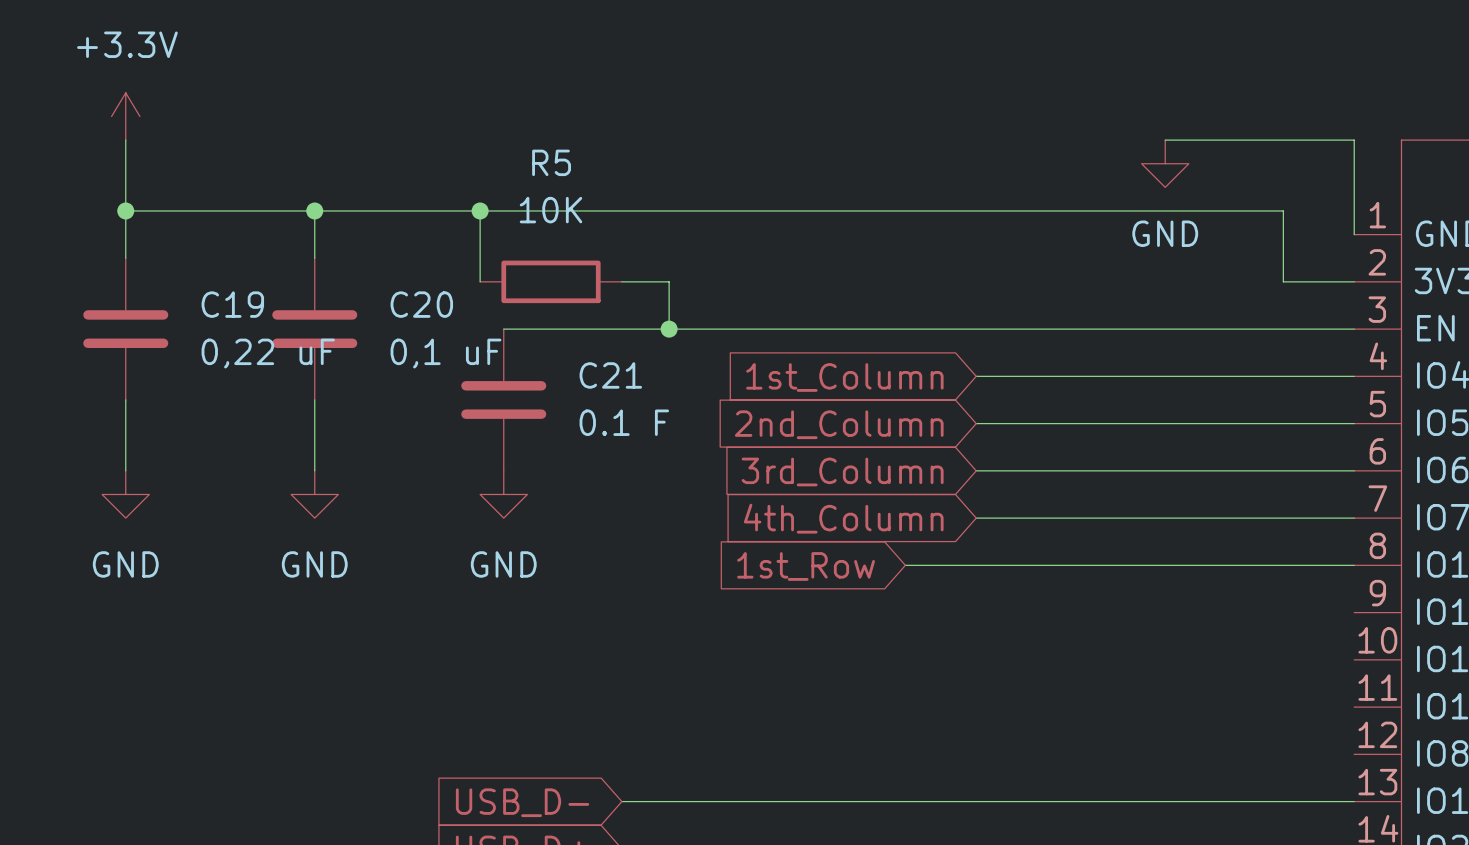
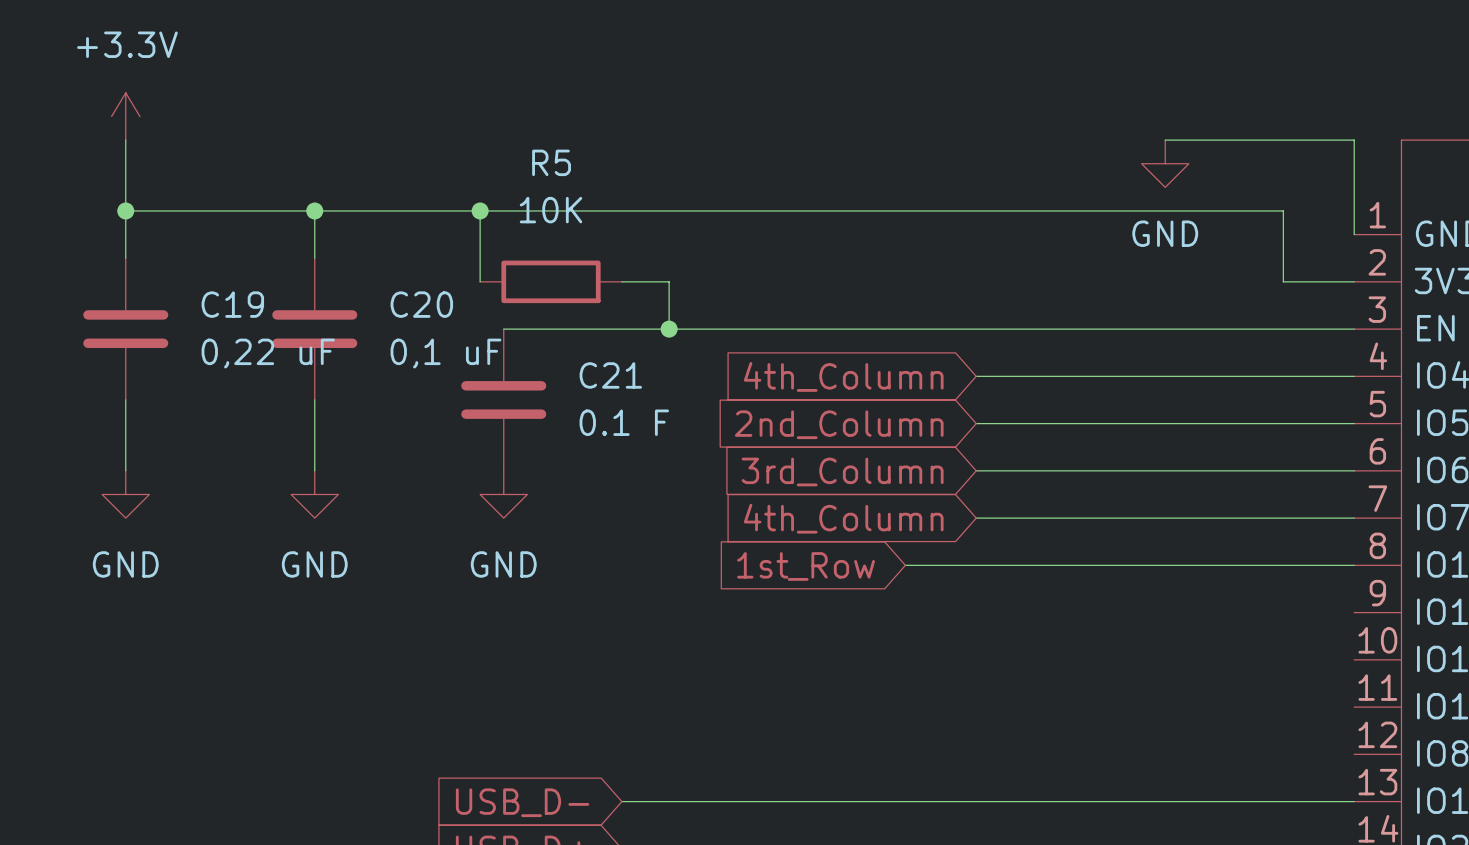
global label: 1st_Column (844, 377) -> 4th_Column (843, 376)

